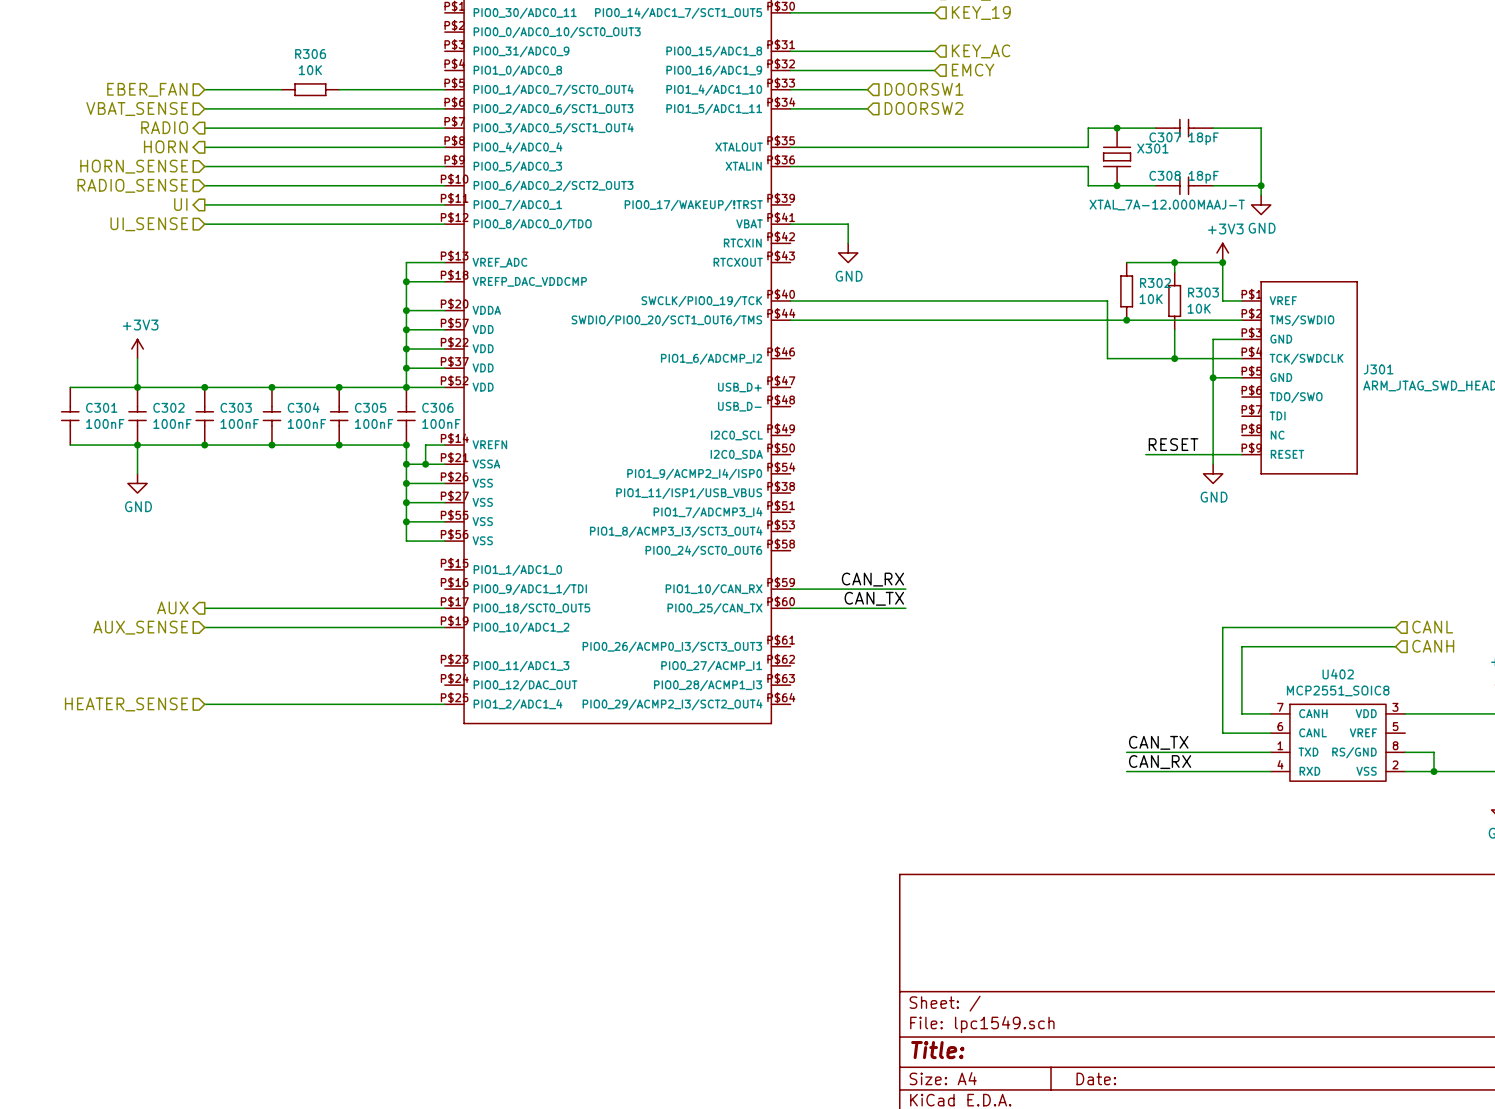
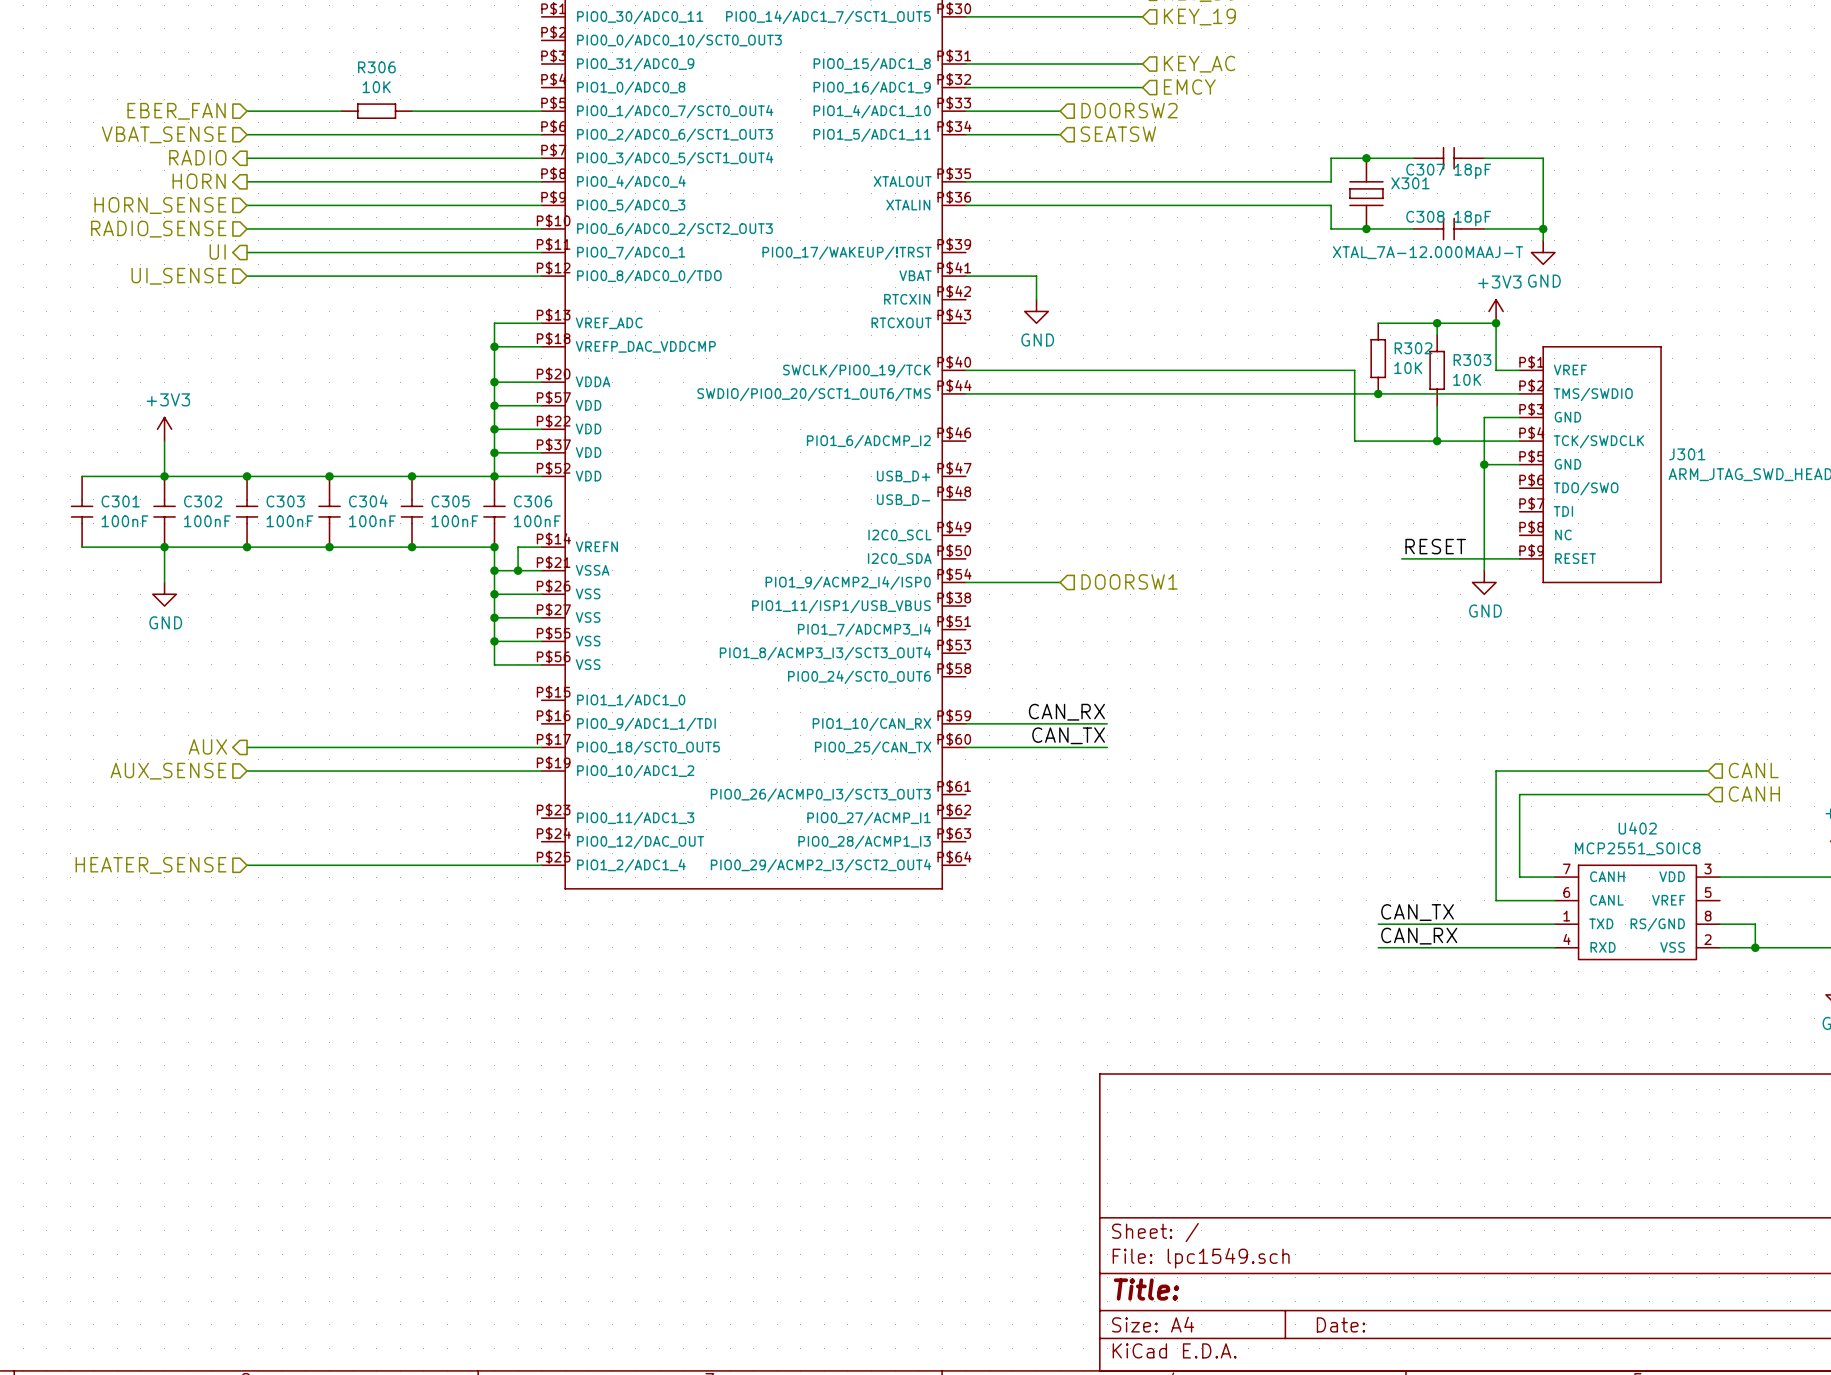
hierarchical label: DOORSW1 (923, 89) -> DOORSW2 (1129, 110)
hierarchical label: DOORSW2 (923, 108) -> SEATSW (1118, 134)
wire: none -> (965, 582) (1060, 582)
hierarchical label: none -> DOORSW1 (1129, 581)

